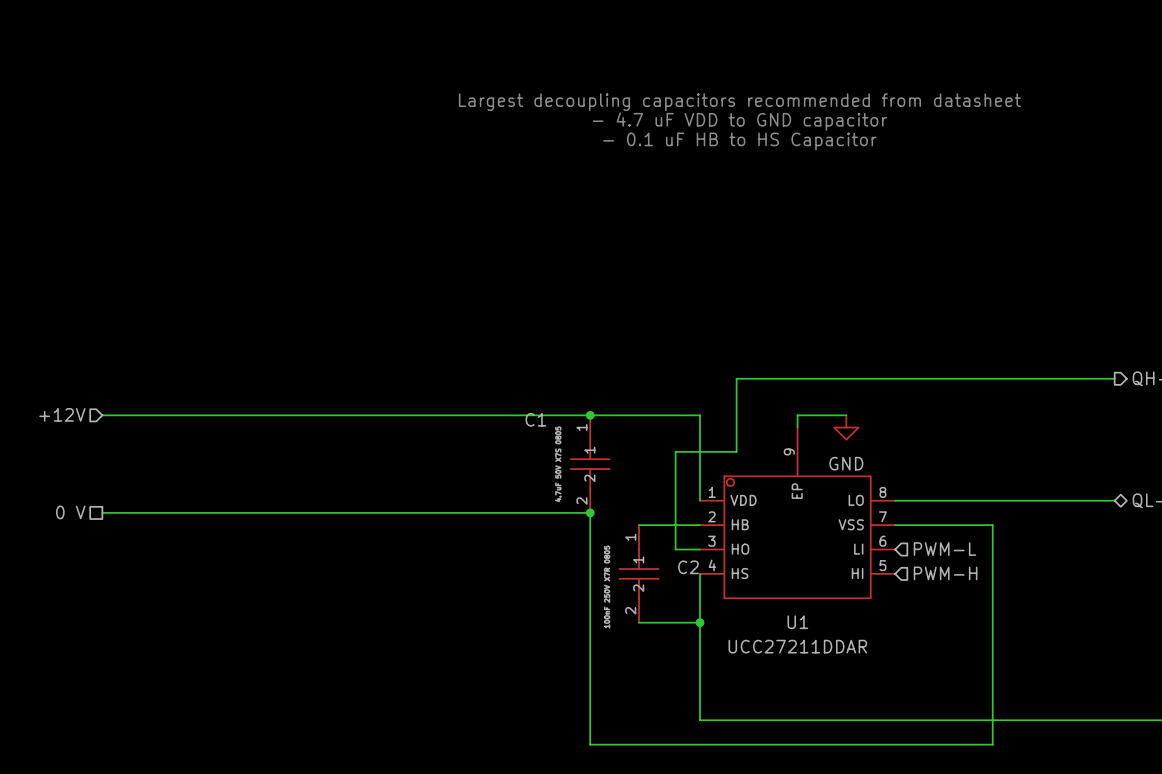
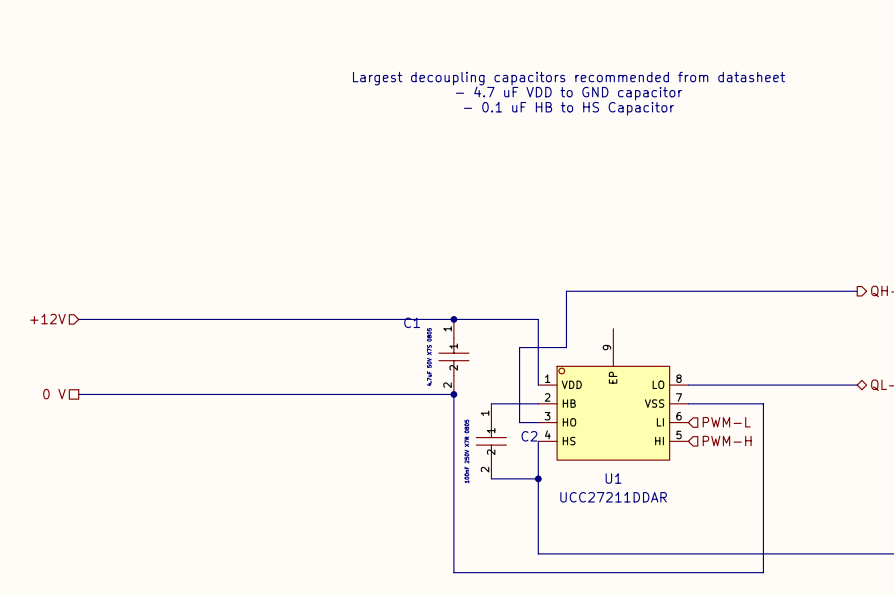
wire: (846, 415) (797, 415) (797, 427) -> none
power symbol: GND (846, 427) -> none

